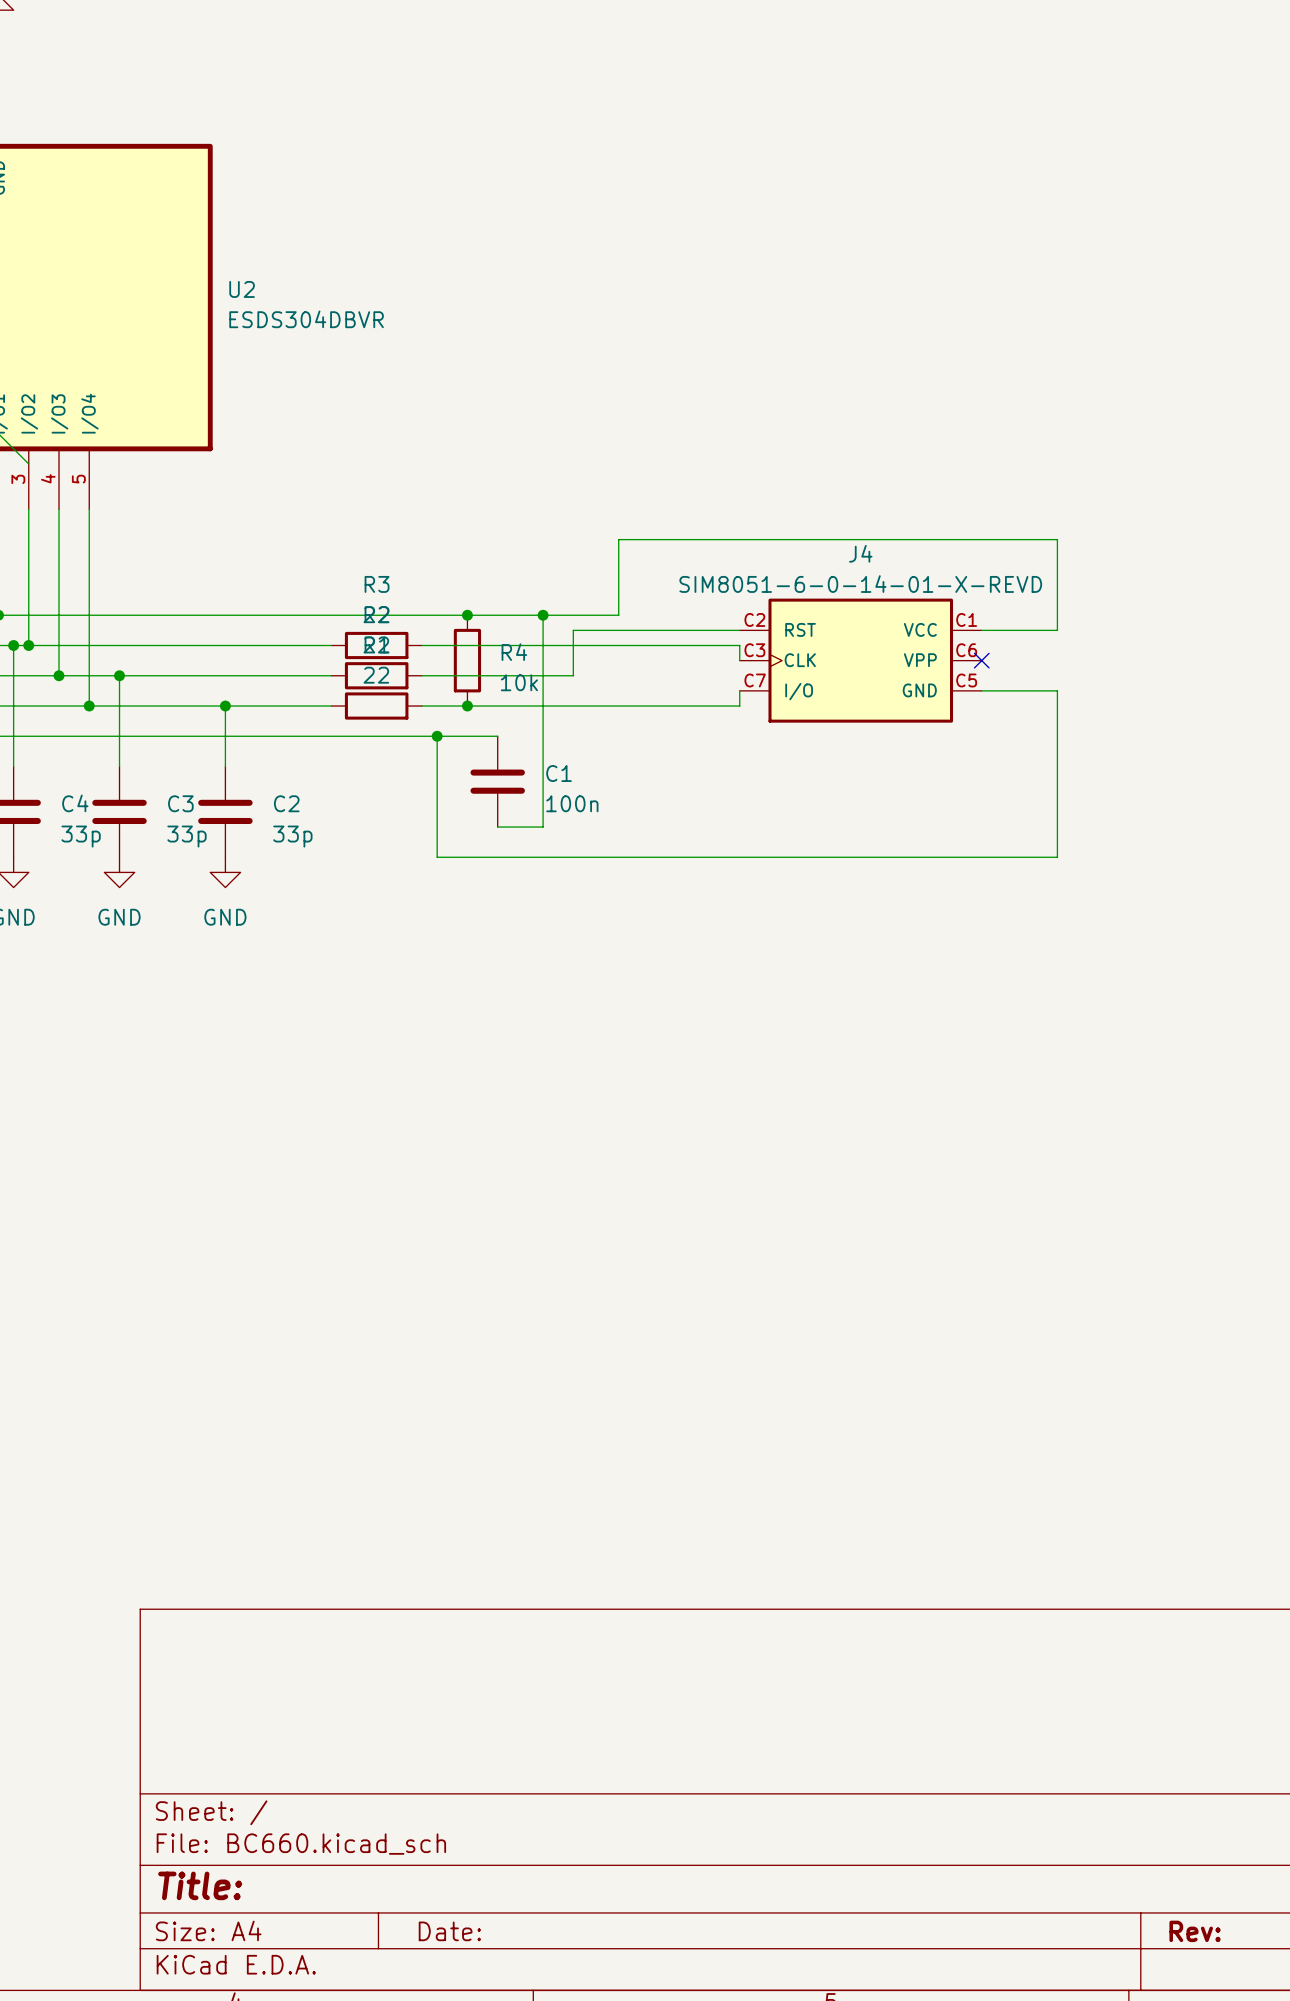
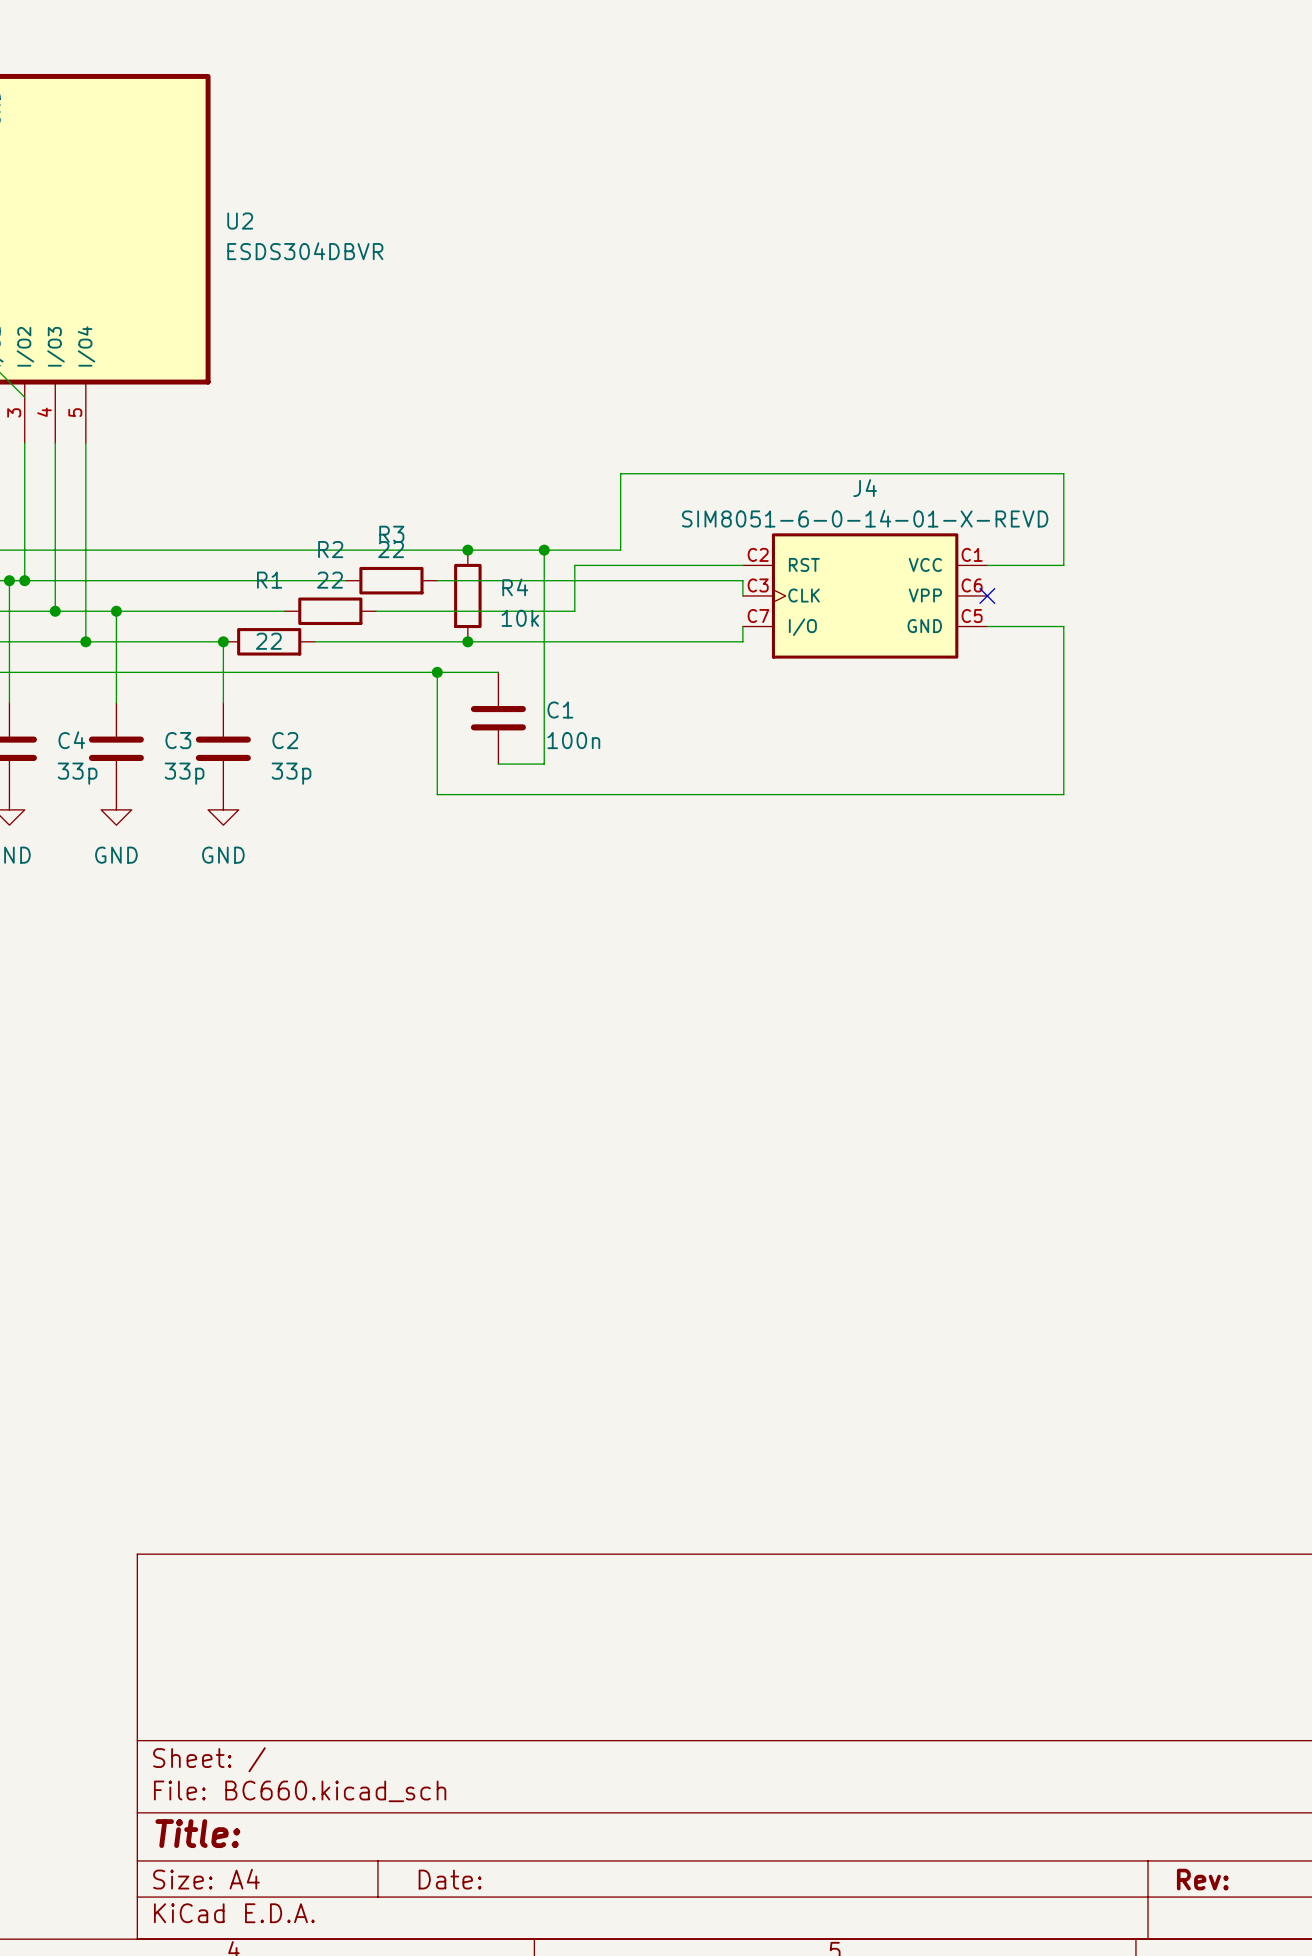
R3 name position: R3 (377, 584) -> R3 (391, 534)
R3 position: (376, 645) -> (391, 580)
wire: (285, 675) (331, 675) -> (376, 611) (422, 611)
R1 value position: 22 (376, 675) -> 22 (268, 641)
R2 position: (376, 675) -> (330, 611)
wire: (225, 706) (316, 706) -> (330, 641) (422, 641)
R1 position: (376, 706) -> (269, 641)

